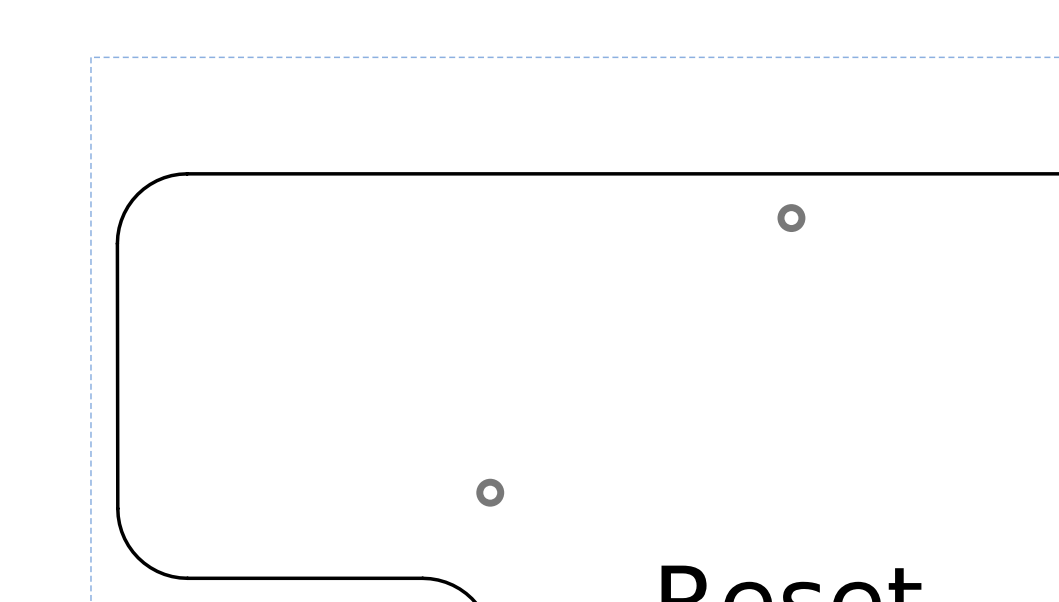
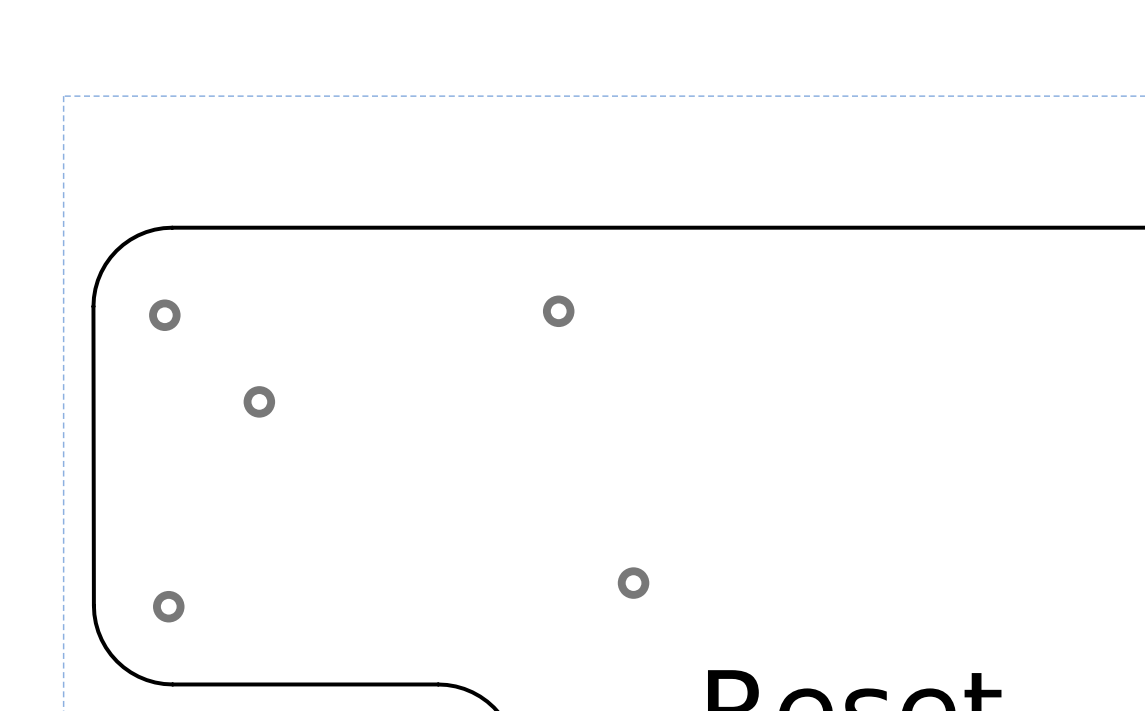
via: (791, 218) -> none
via: none -> (558, 311)
via: none -> (164, 315)
via: none -> (259, 401)
via position: (490, 492) -> (633, 583)
via: none -> (168, 606)

